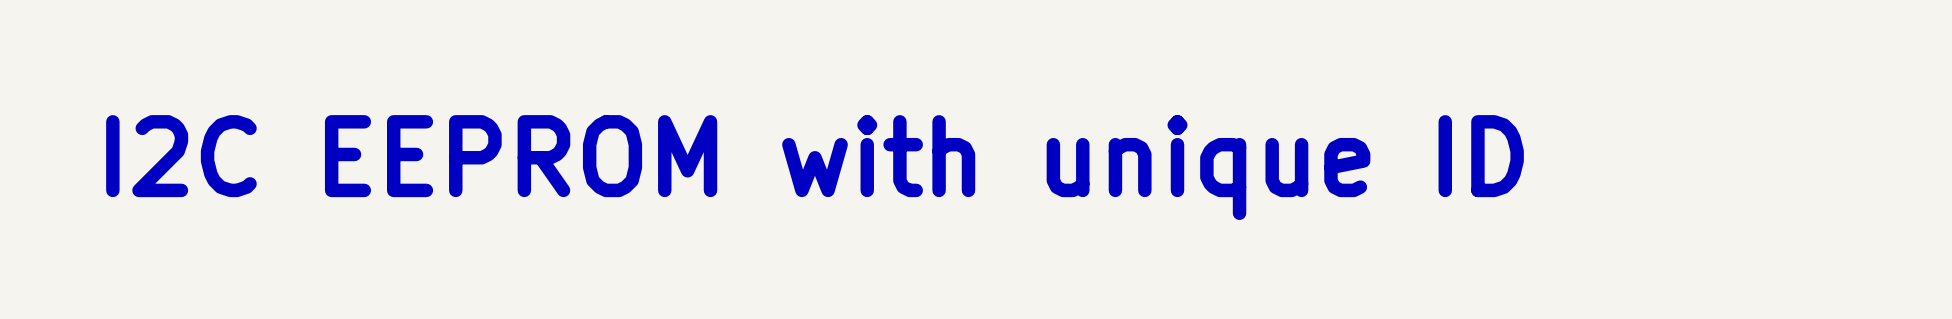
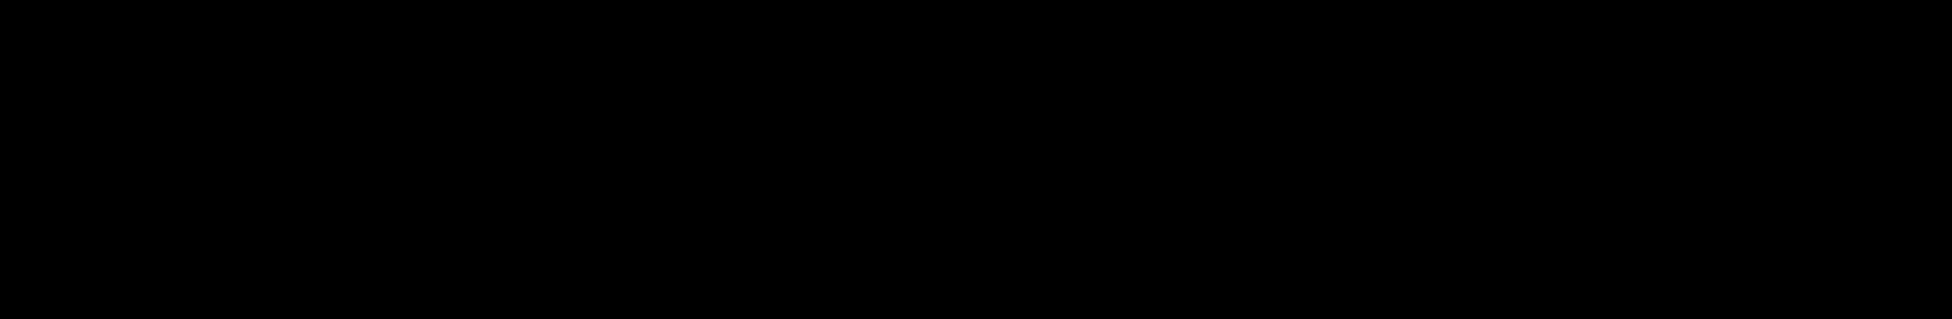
text: I2C EEPROM with unique ID (814, 167) -> none

